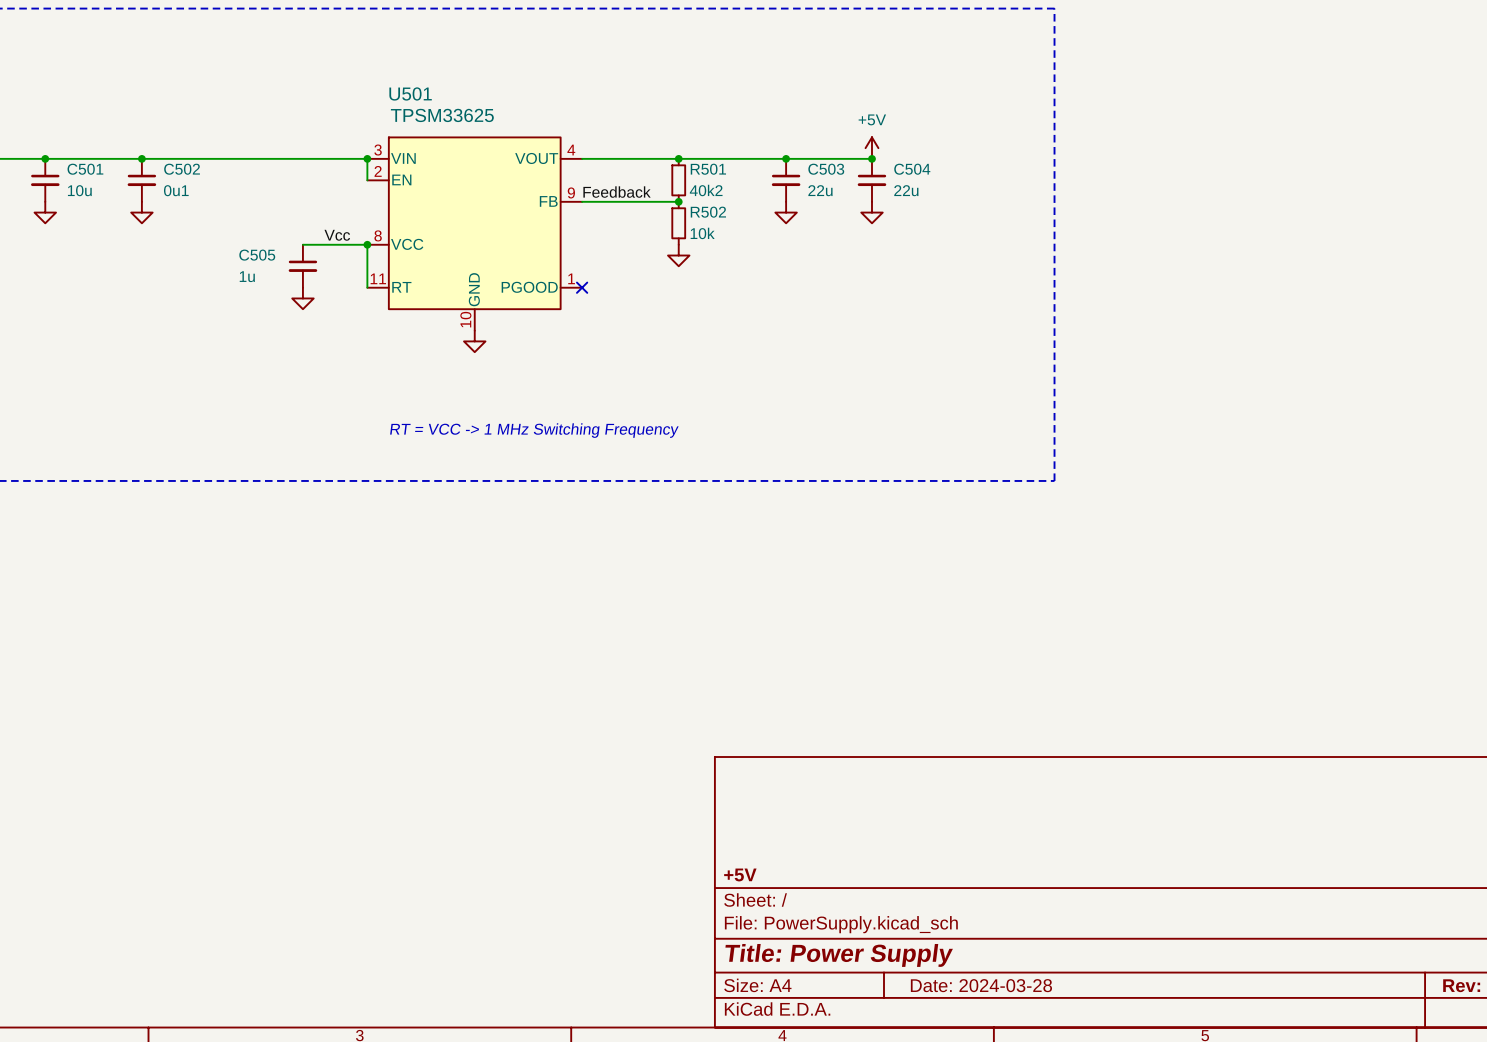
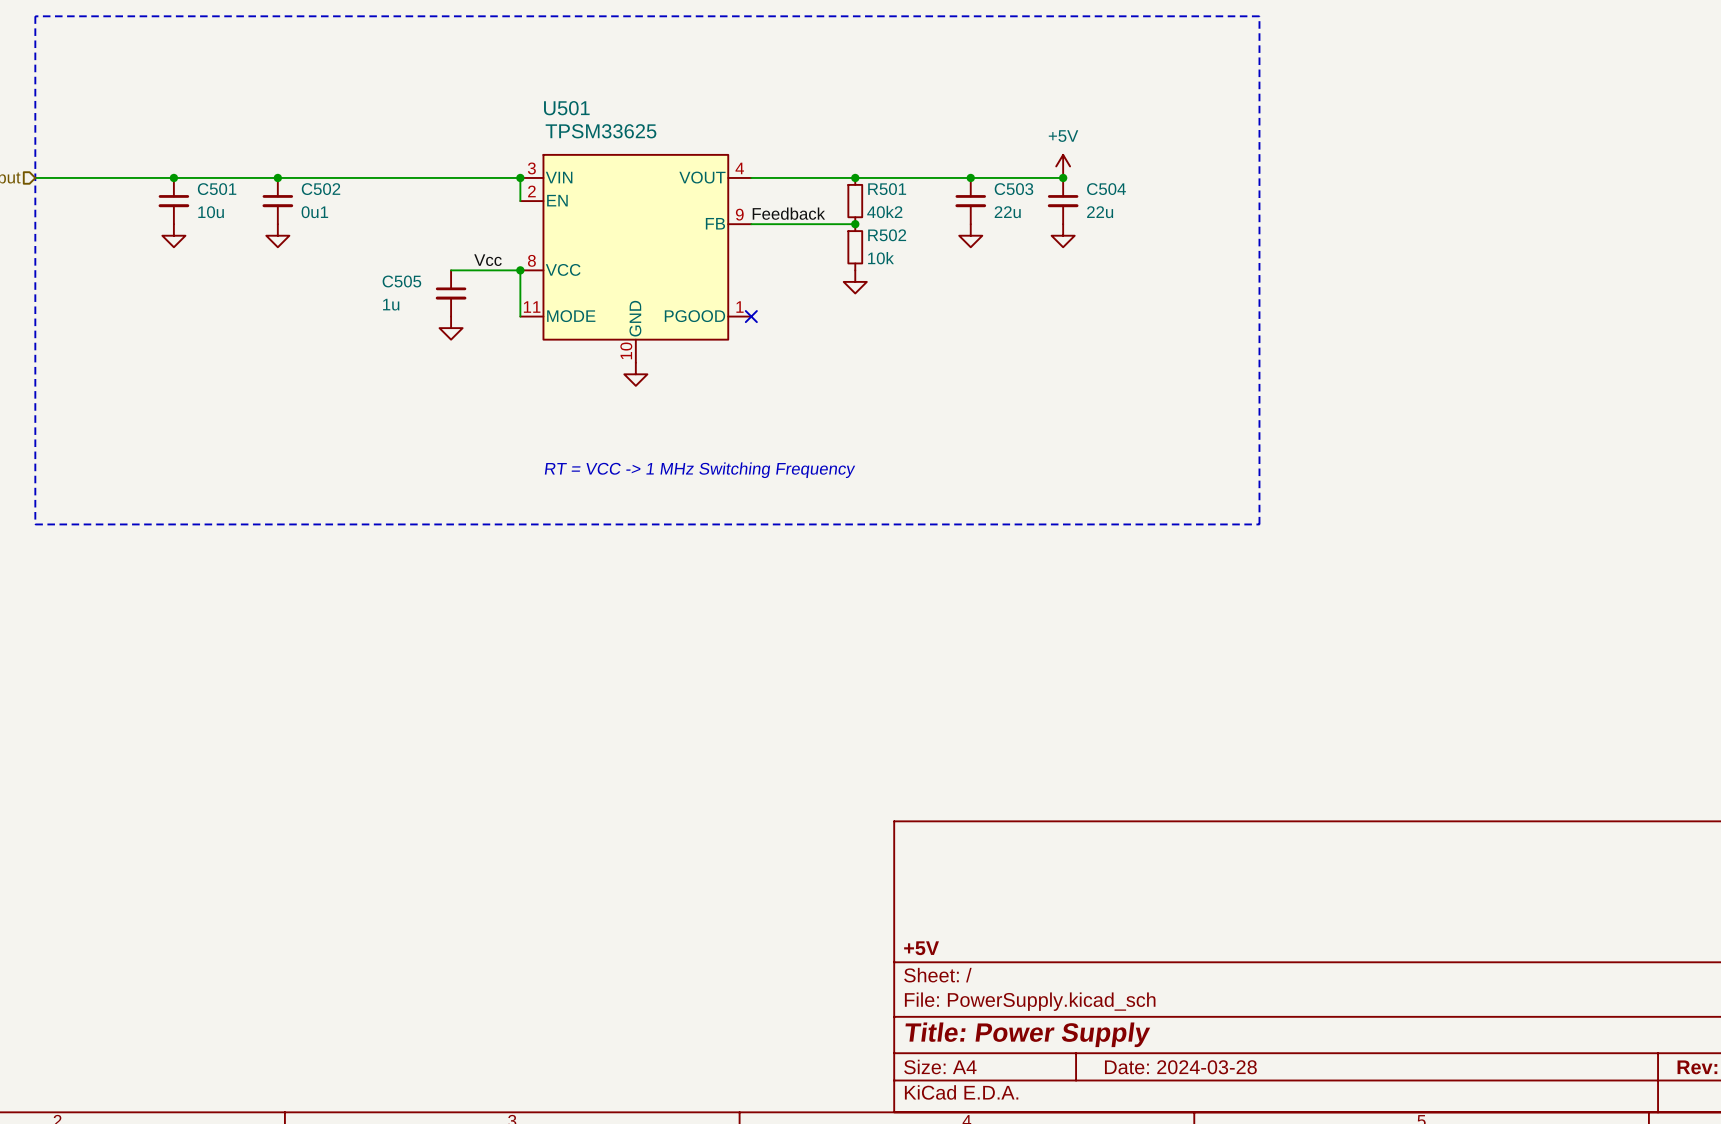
U501 pin name: RT (401, 287) -> MODE (571, 316)

